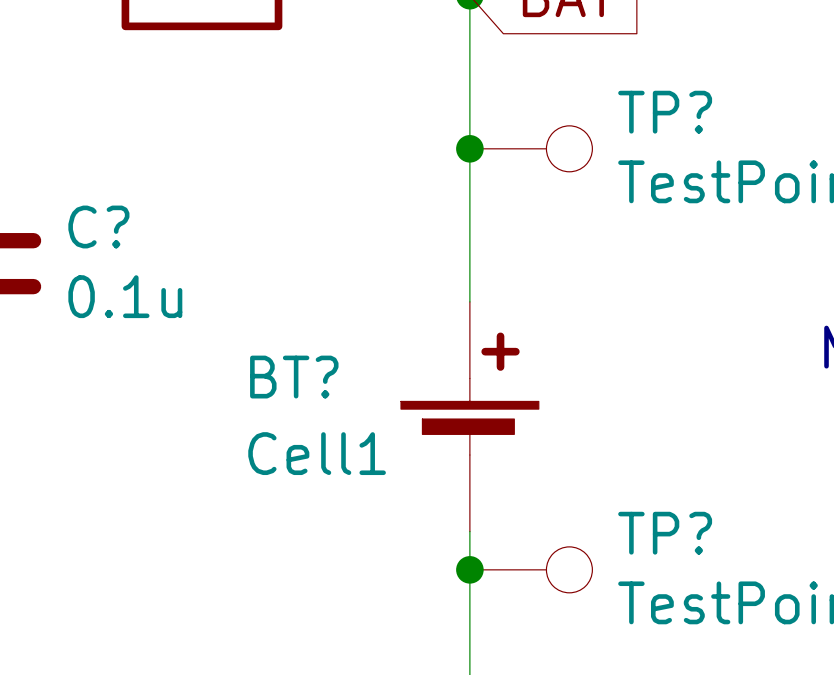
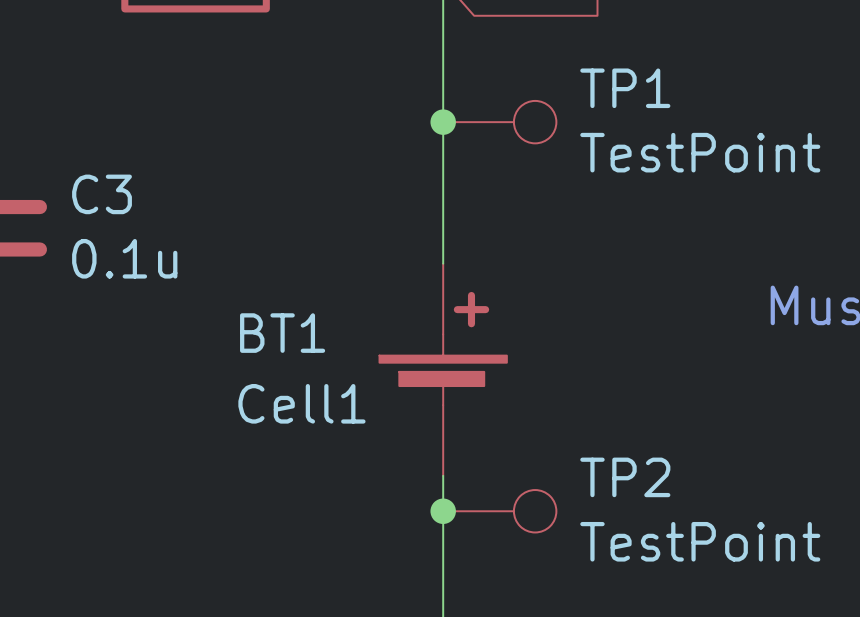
TP? name: TP? (665, 112) -> TP1 (625, 88)
C? name: C? (98, 227) -> C3 (102, 194)
BT? name: BT? (294, 377) -> BT1 (282, 333)
TP? name: TP? (665, 533) -> TP2 (625, 477)

